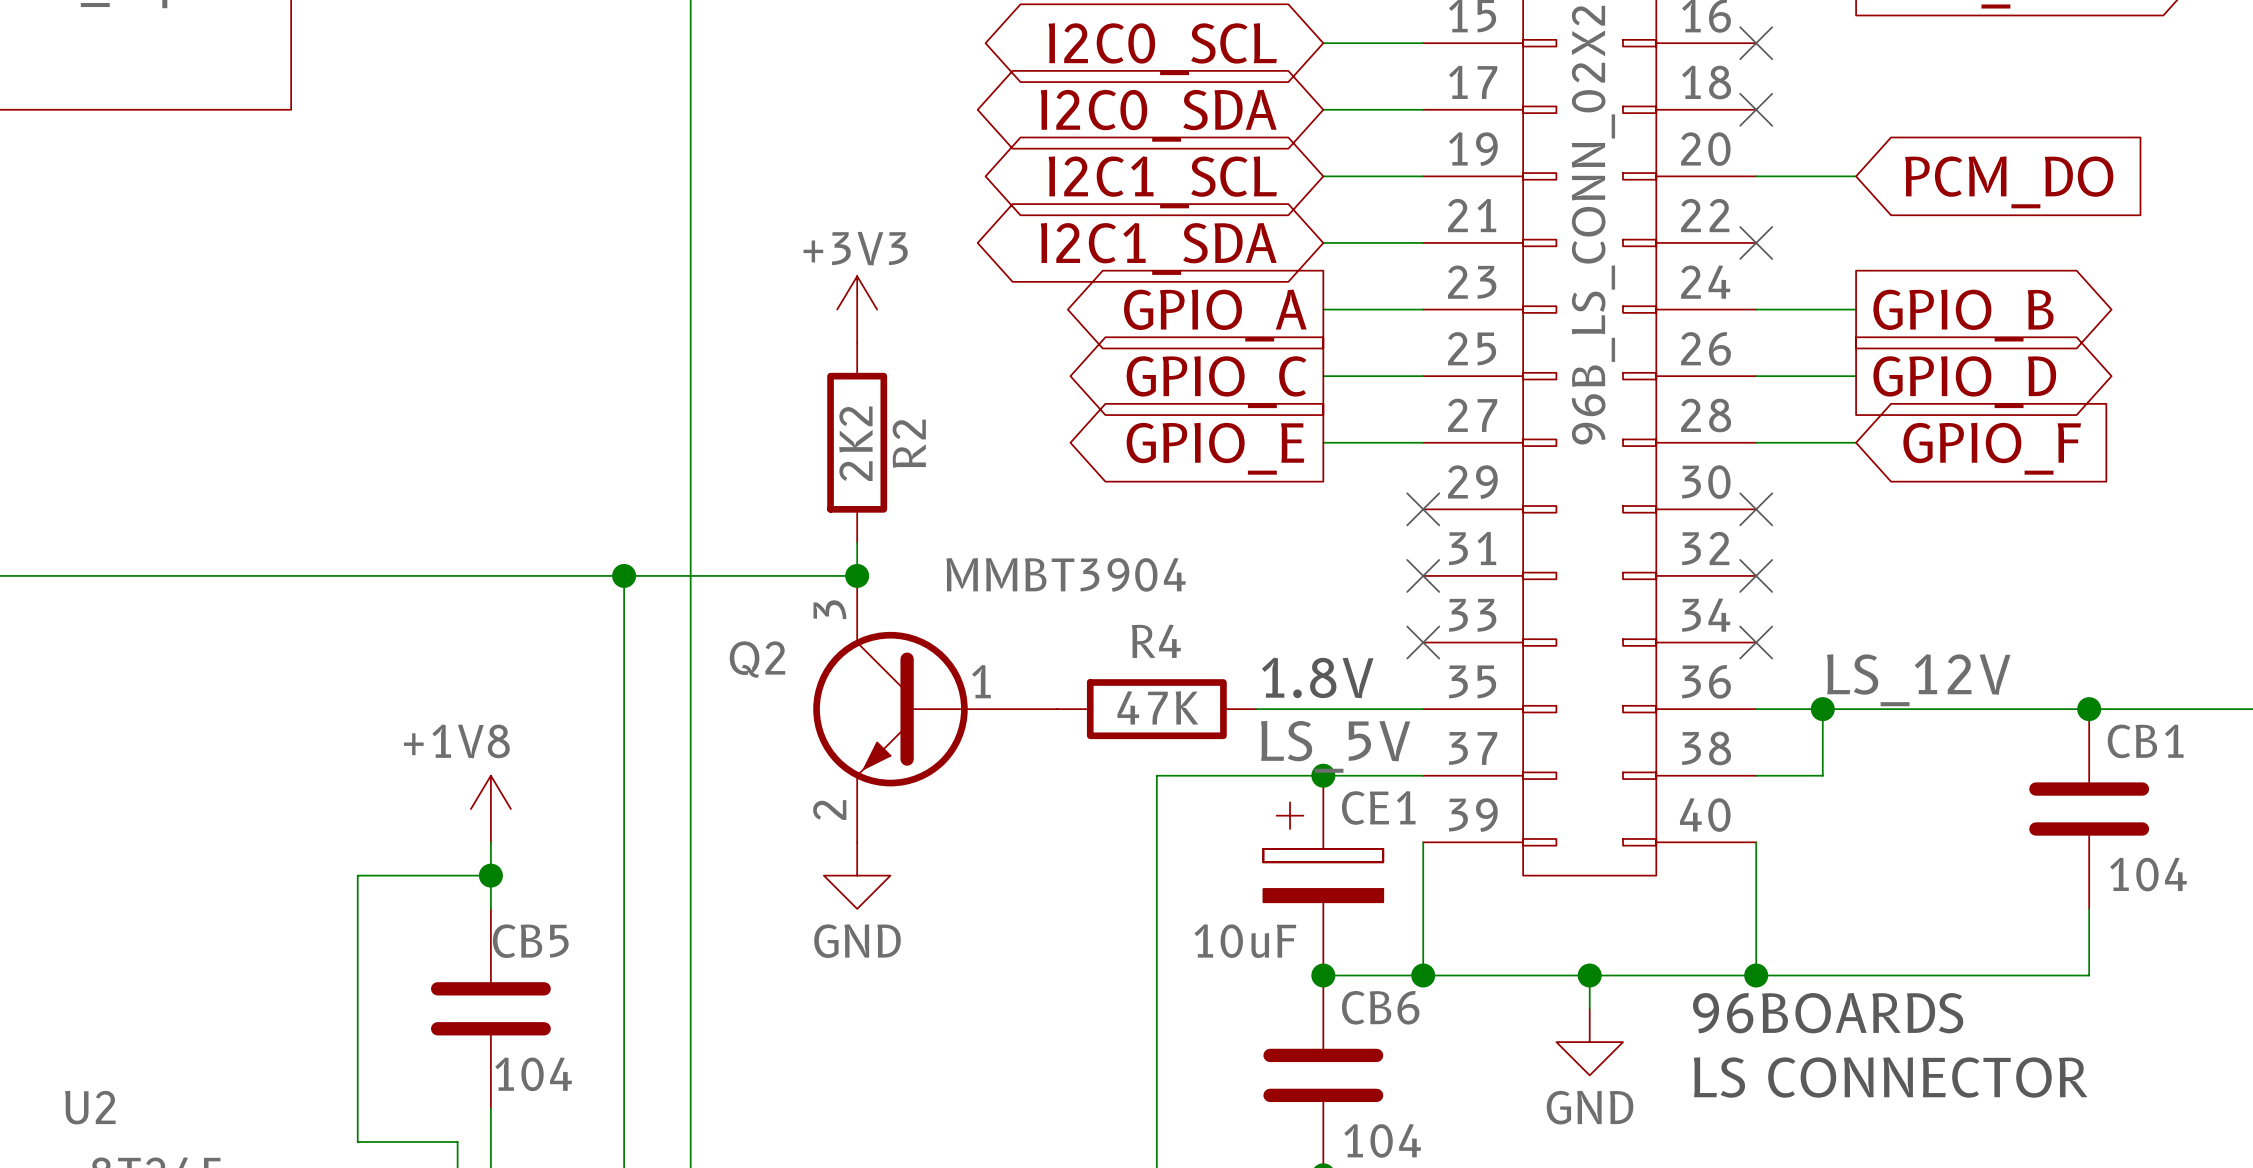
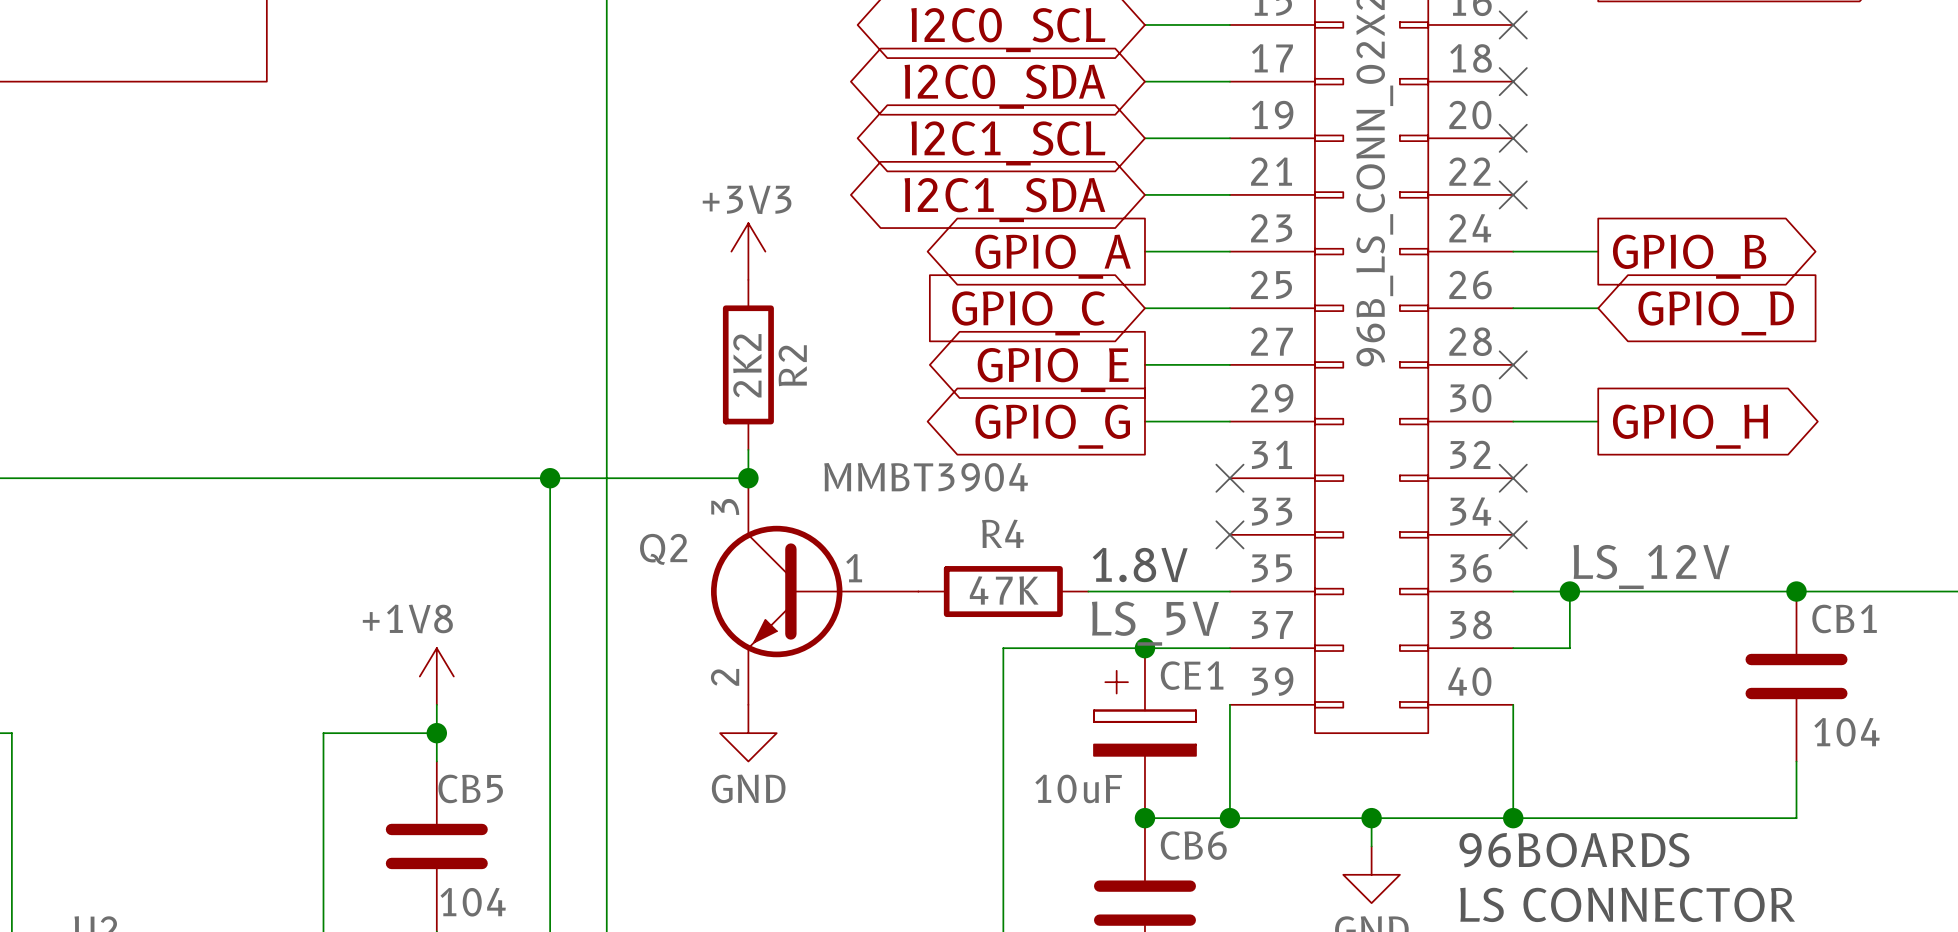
wire: (1756, 176) (1856, 176) -> (1144, 421) (1229, 421)
no-connect mark: none -> (1513, 138)
global label: PCM_DO (2009, 182) -> none
global label shape: output (1216, 382) -> input (1028, 313)
global label shape: output (1964, 382) -> input (1716, 313)
wire: (1756, 442) (1856, 442) -> (1513, 421) (1598, 421)
global label shape: input (1992, 448) -> output (1690, 426)
global label: GPIO_F (1992, 448) -> GPIO_H (1690, 426)
no-connect mark: (1423, 509) -> none
no-connect mark position: (1756, 509) -> (1513, 364)
global label: none -> GPIO_G (1052, 426)

